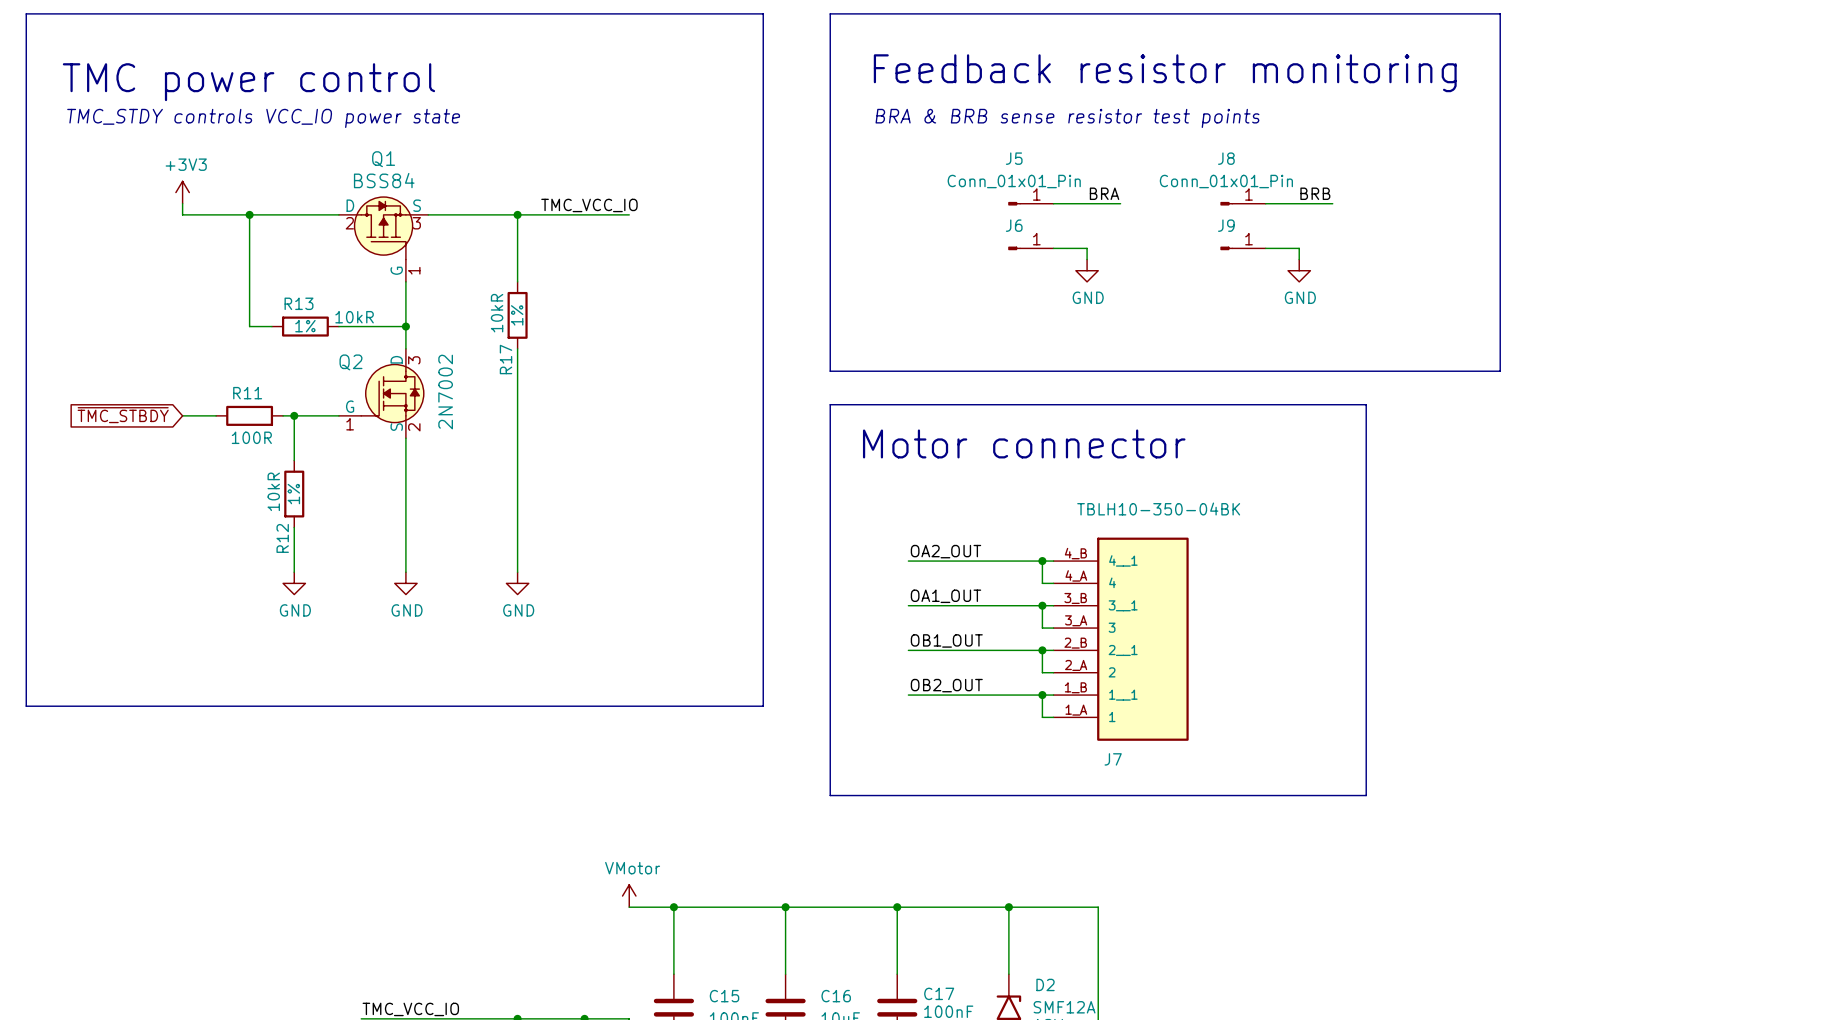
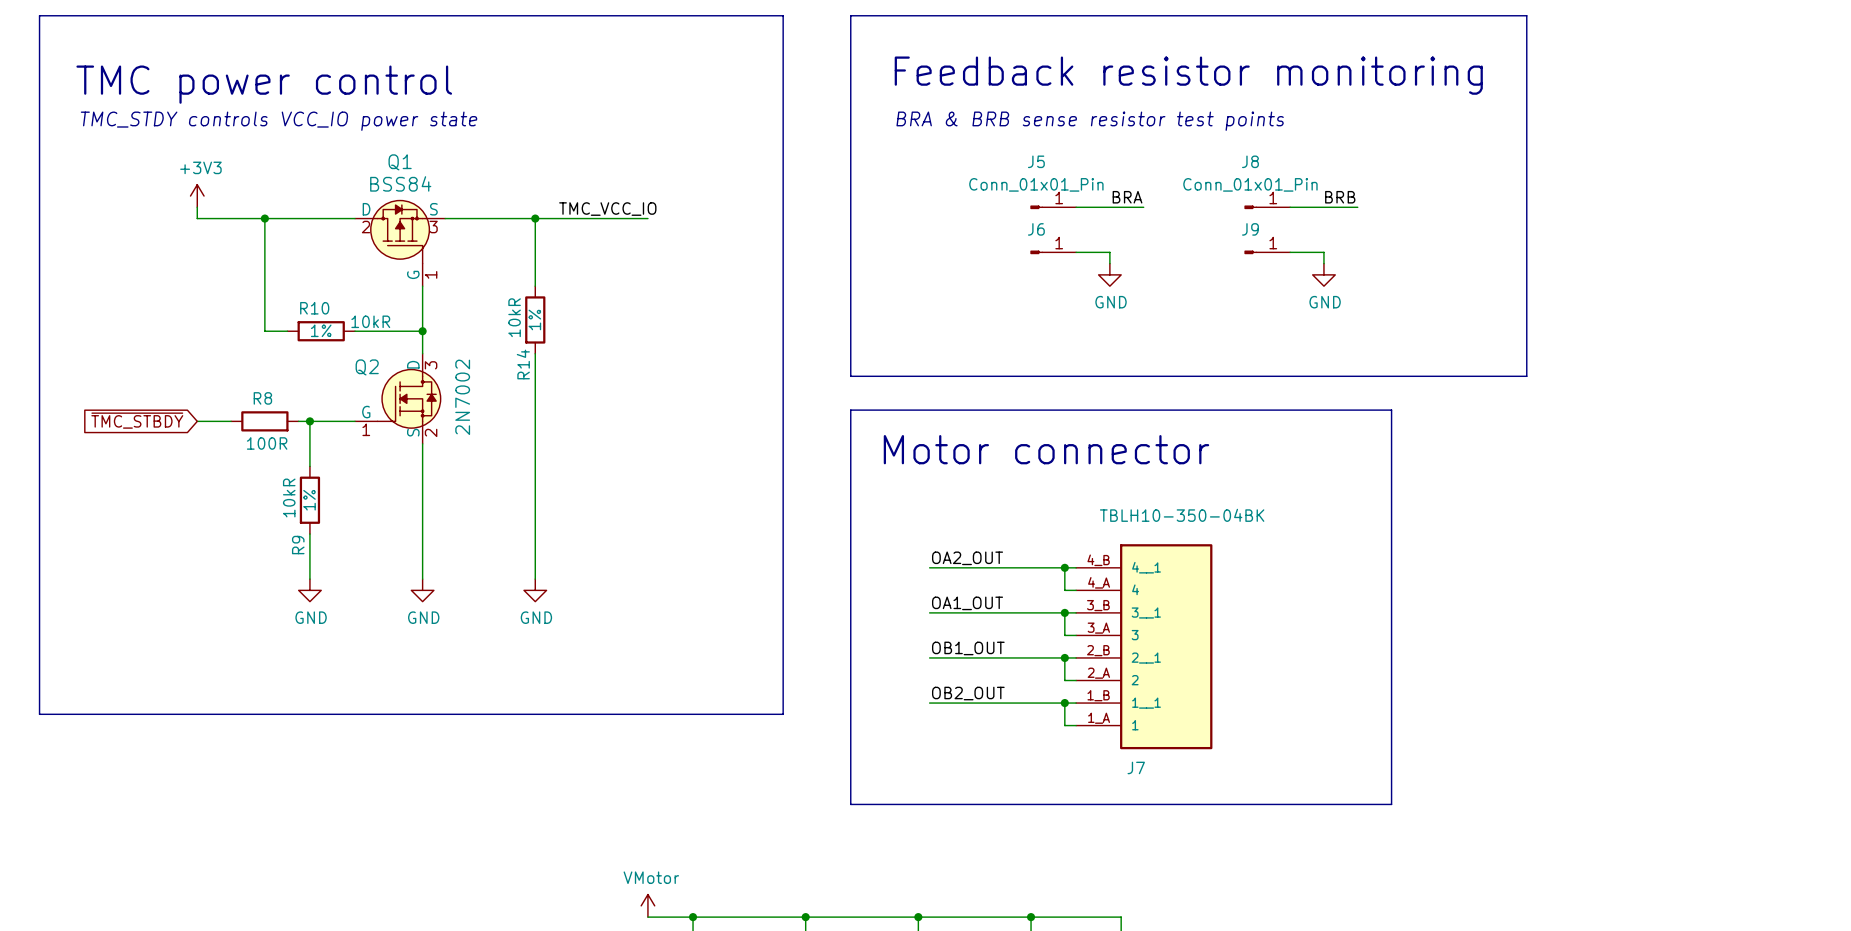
R13 name: R13 (298, 303) -> R10 (314, 308)
R17 name: R17 (506, 359) -> R14 (523, 364)
R11 name: R11 (247, 393) -> R8 (262, 398)
R12 name: R12 (282, 538) -> R9 (298, 545)

